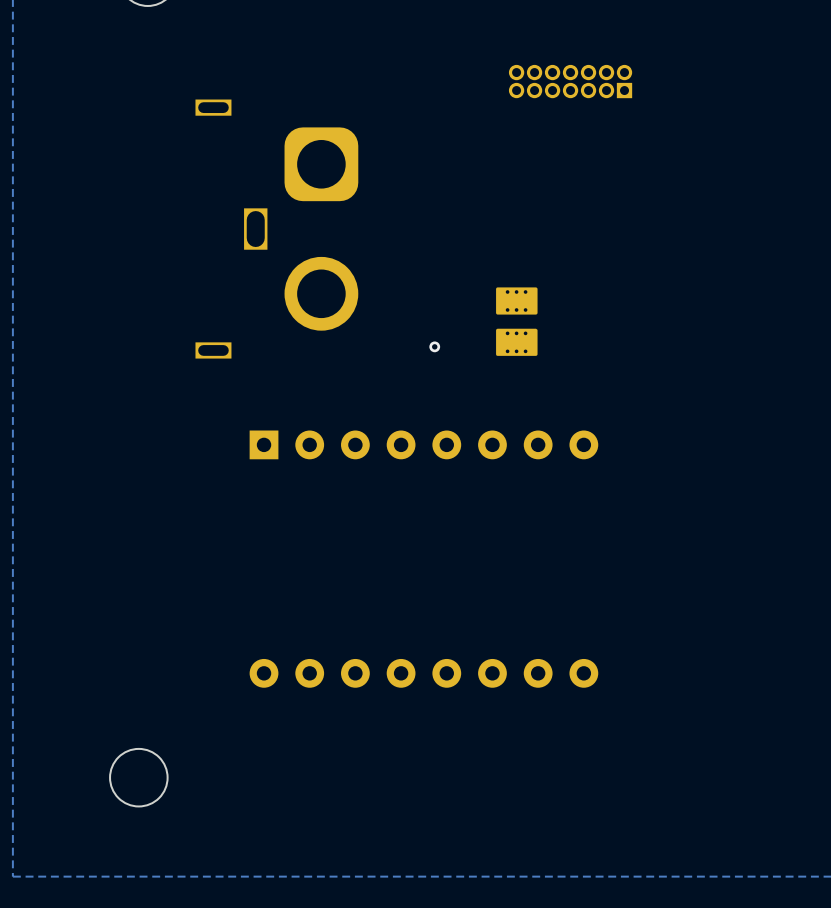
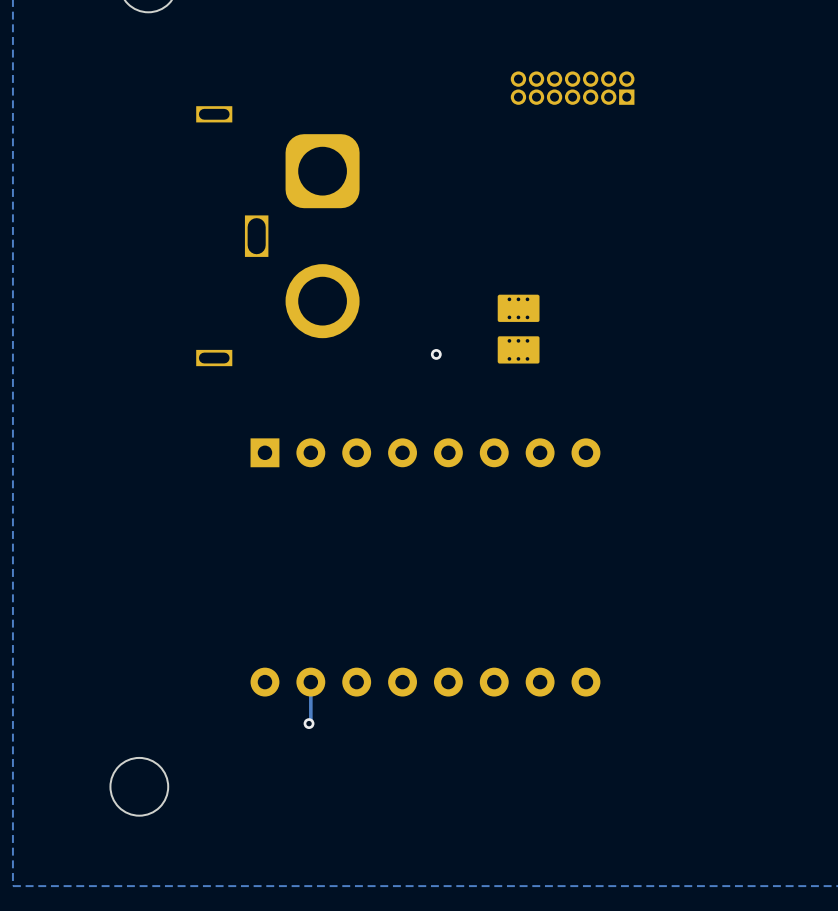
track: none -> (310, 682) (310, 721) (309, 723)
via: none -> (309, 723)

